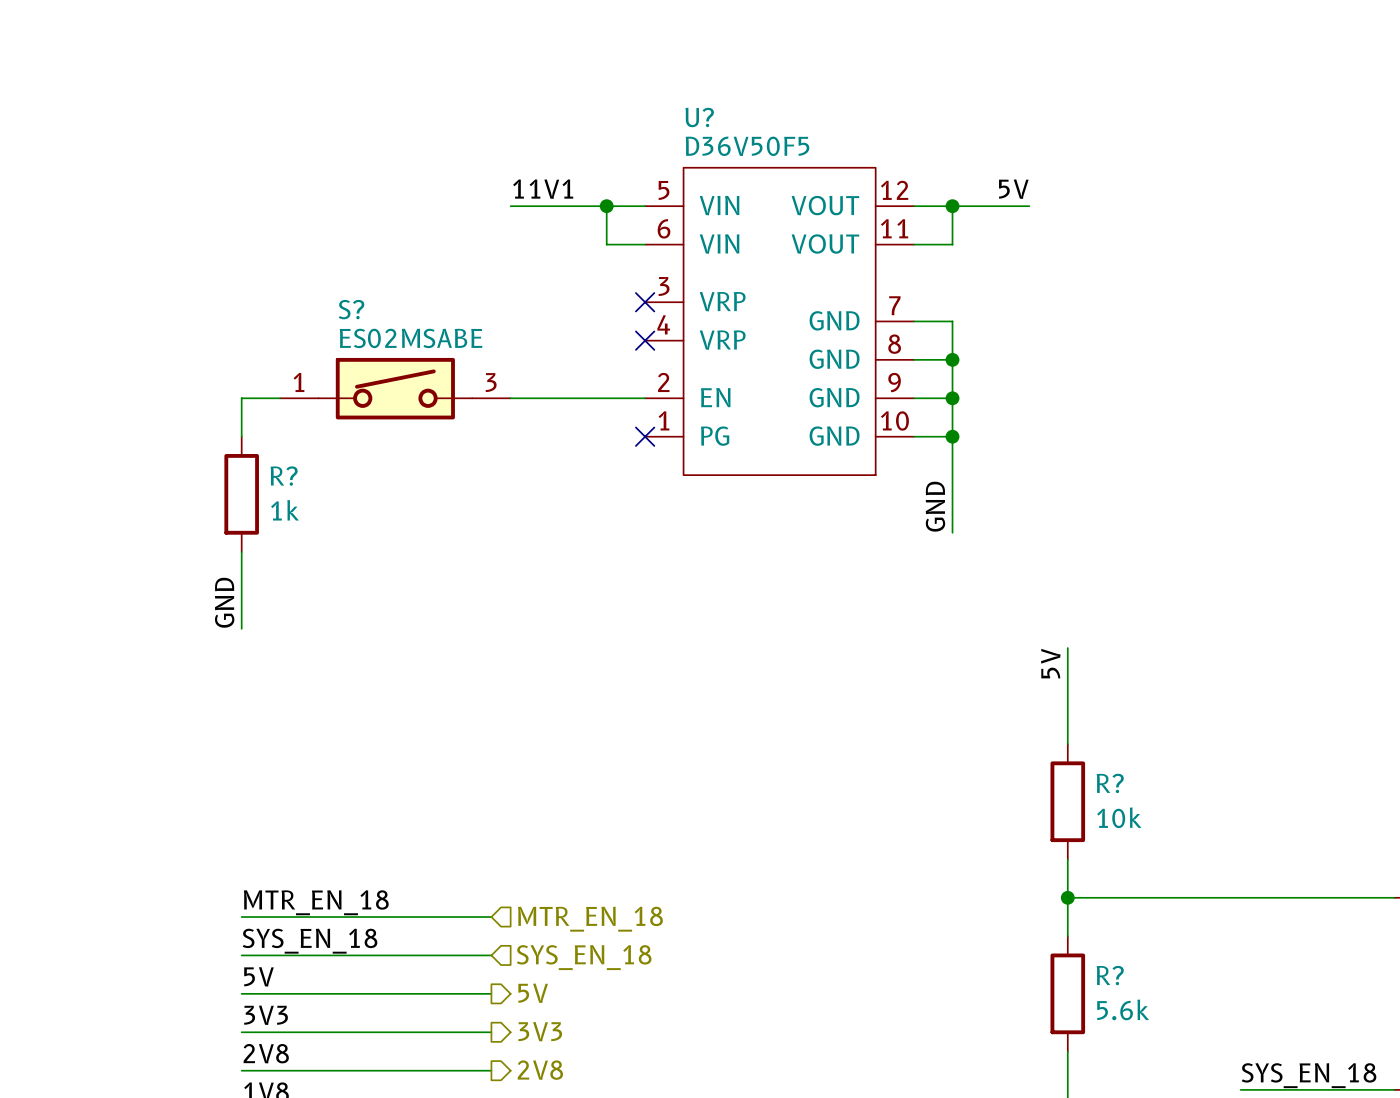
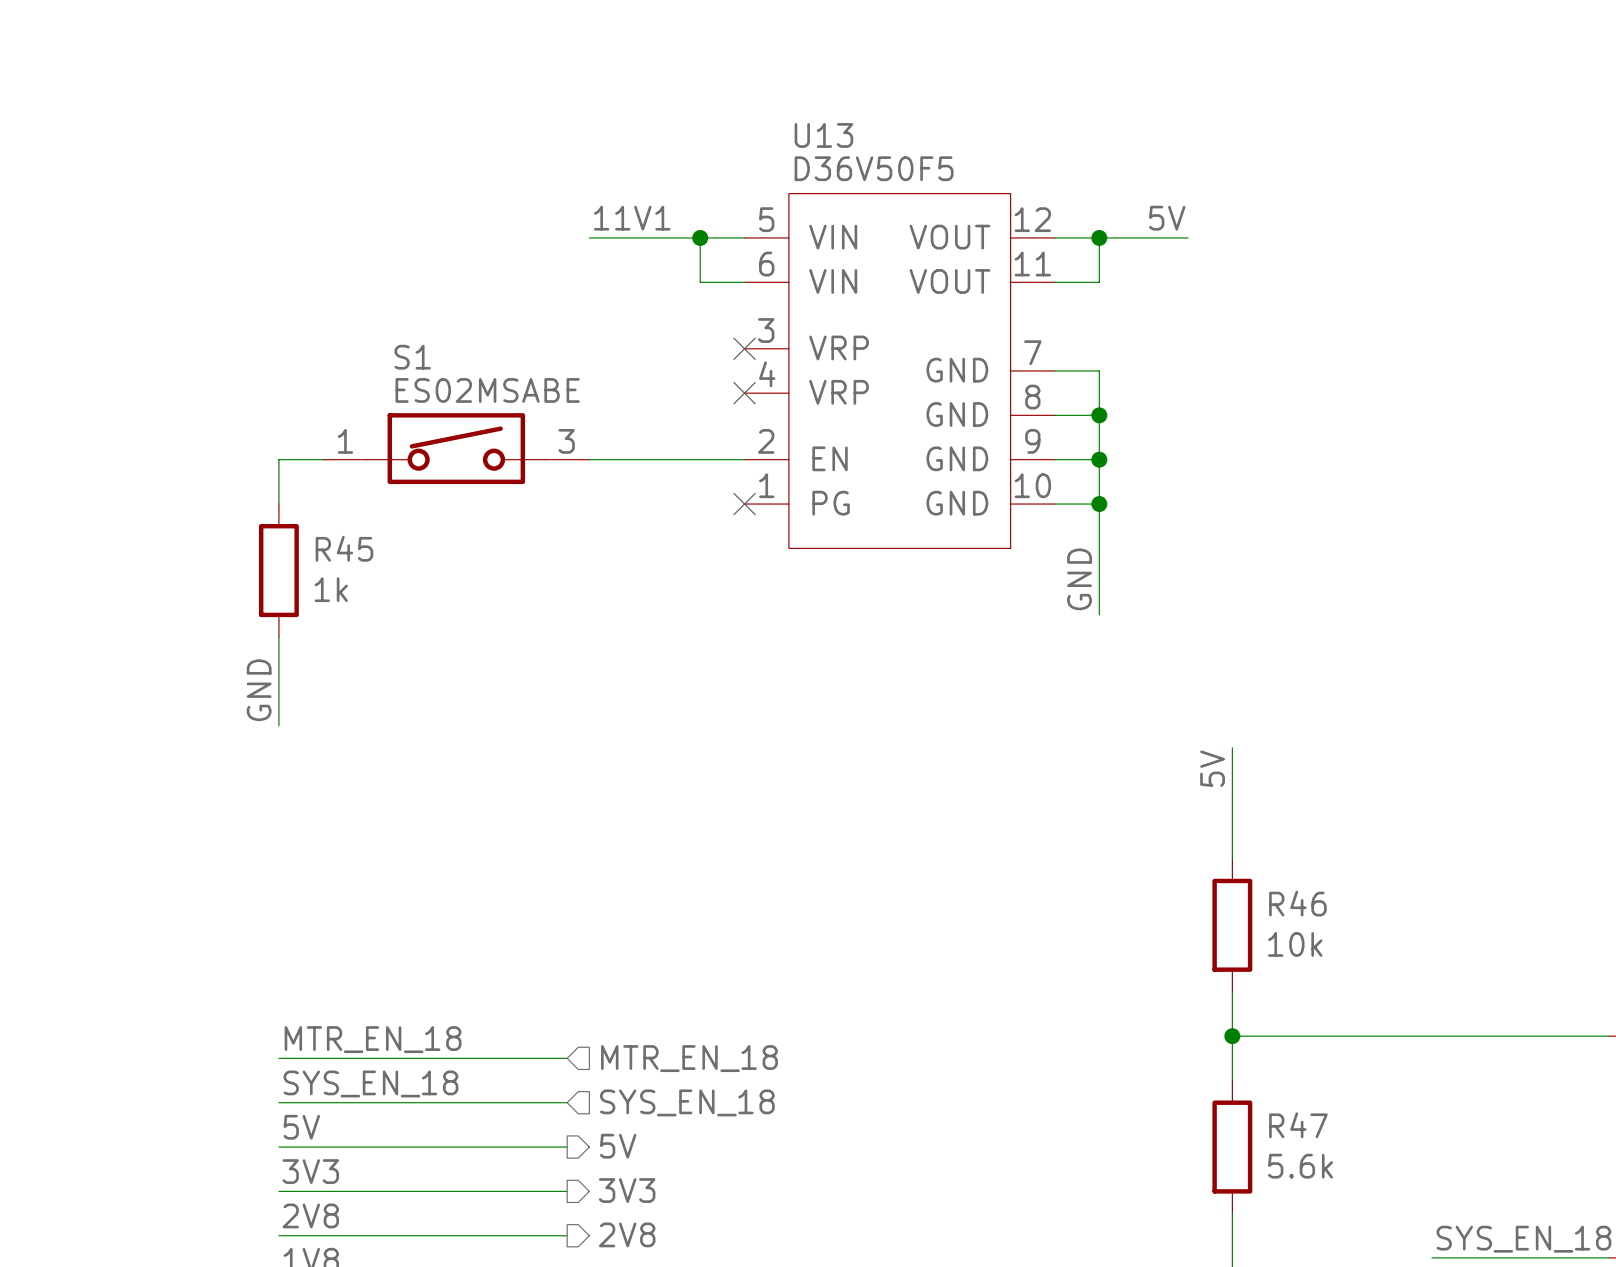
U? name: U? (699, 117) -> U13 (823, 135)
S? name: S? (351, 309) -> S1 (412, 357)
R? name: R? (284, 476) -> R45 (344, 548)
R? name: R? (1110, 783) -> R46 (1297, 903)
R? name: R? (1110, 975) -> R47 (1298, 1125)

